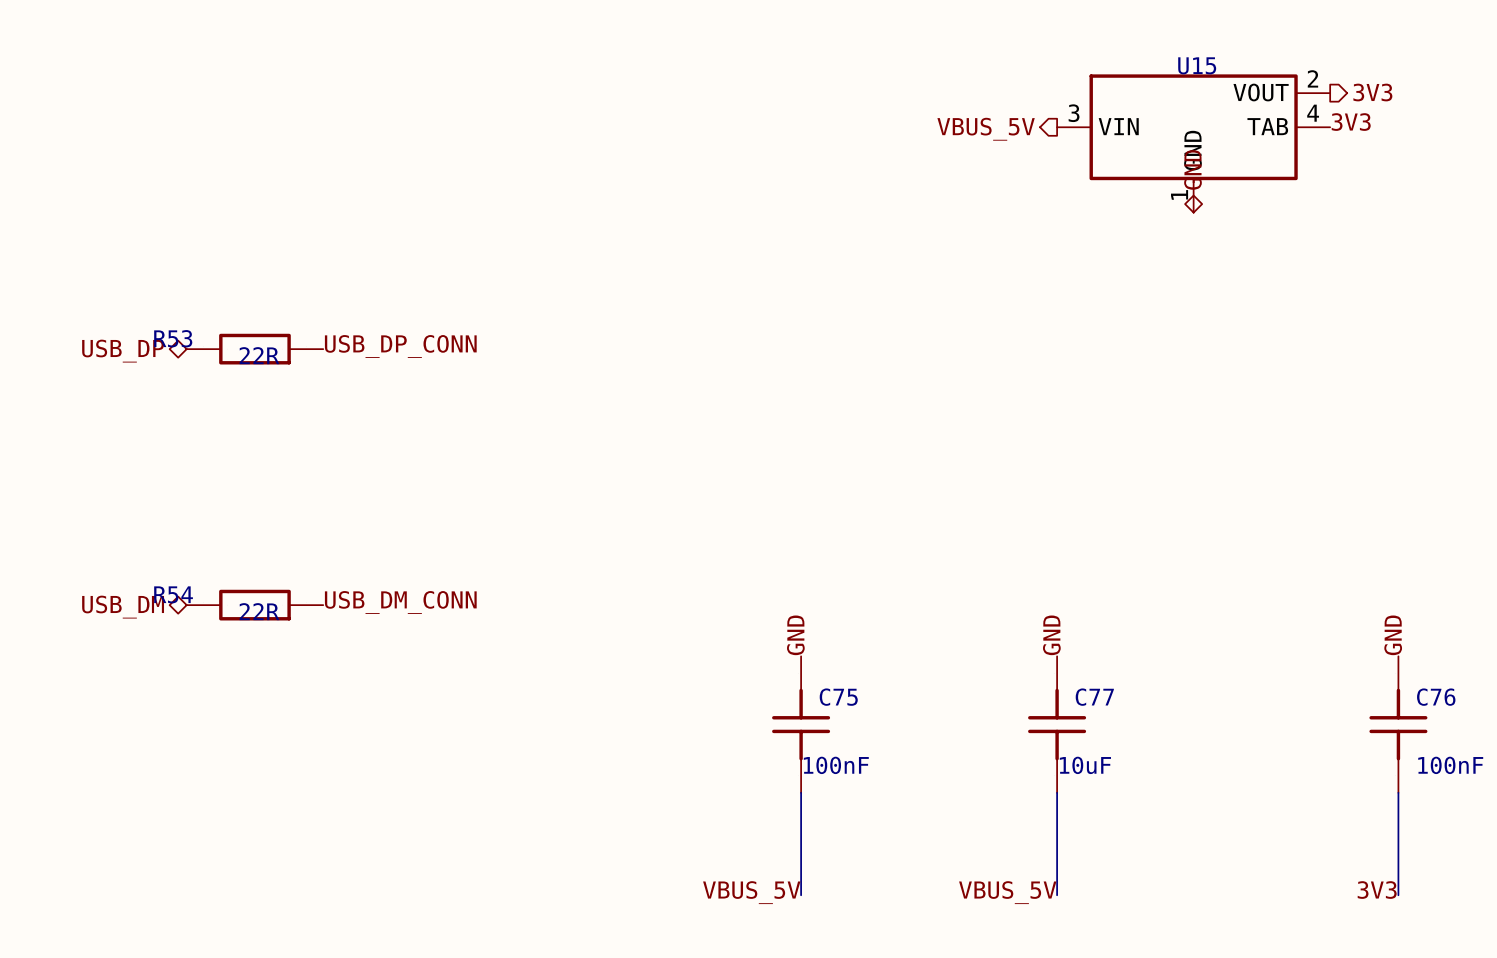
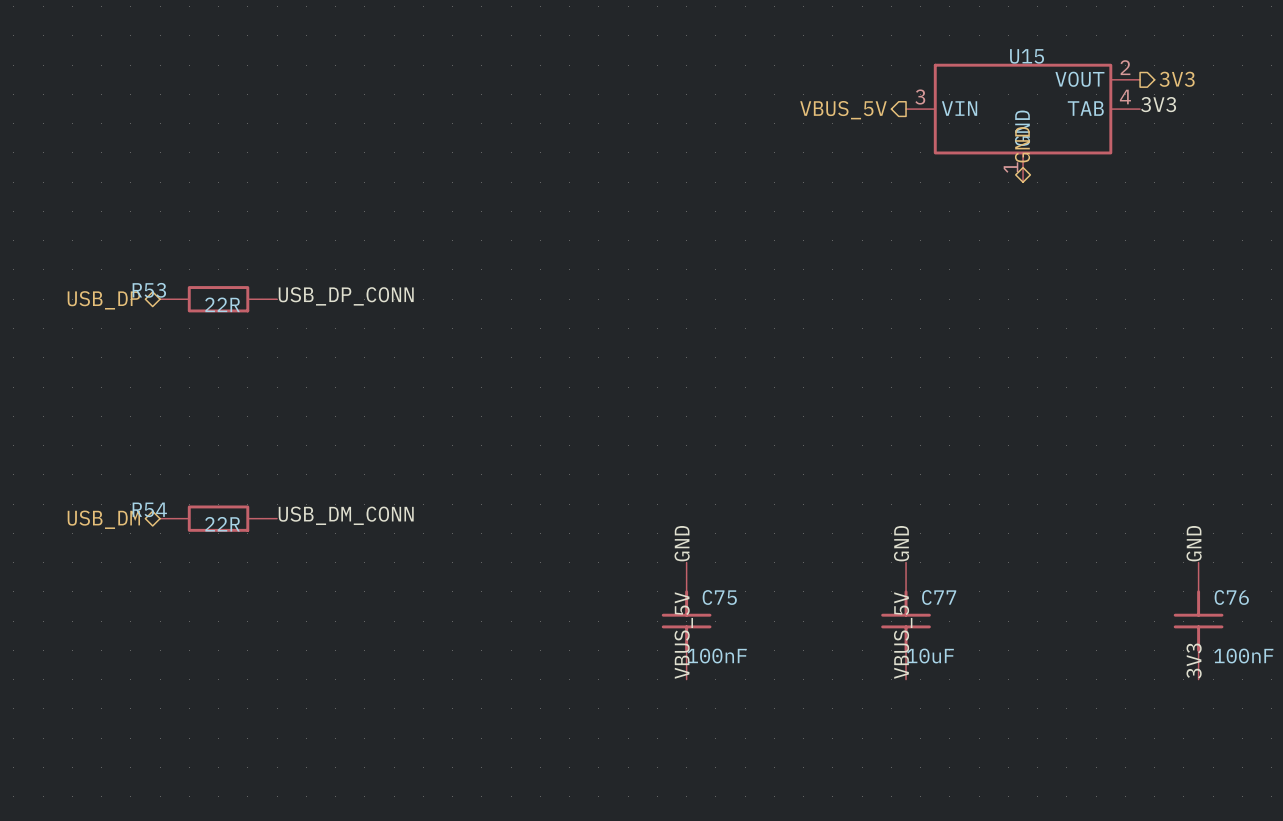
wire: (801, 792) (801, 895) -> none
wire: (1057, 792) (1057, 895) -> none
wire: (1398, 792) (1398, 895) -> none
label rotation: 0° (1377, 890) -> 90° counterclockwise (1194, 661)
label position: 3V3 (1377, 890) -> 3V3 (1194, 661)
label rotation: 0° (751, 892) -> 90° counterclockwise (683, 635)
label position: VBUS_5V (751, 892) -> VBUS_5V (683, 635)
label rotation: 0° (1007, 892) -> 90° counterclockwise (903, 635)
label position: VBUS_5V (1007, 892) -> VBUS_5V (903, 635)

